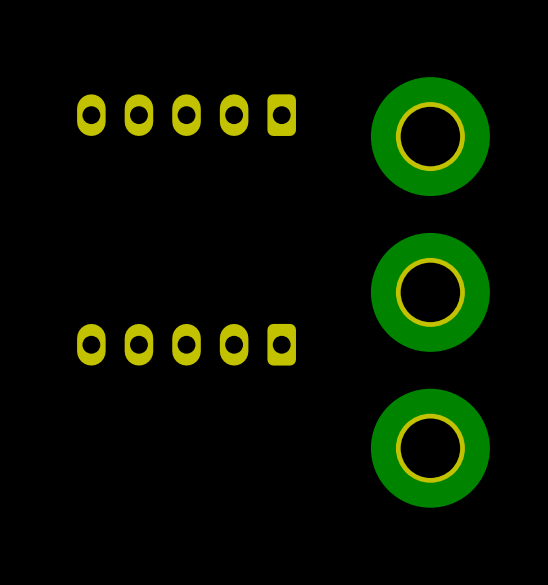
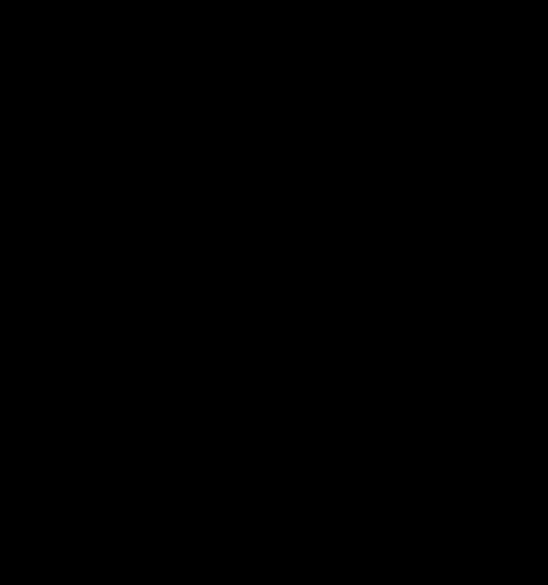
part: (186, 115) -> none
part: (430, 136) -> none
part: (430, 292) -> none
part: (186, 344) -> none
part: (430, 448) -> none

